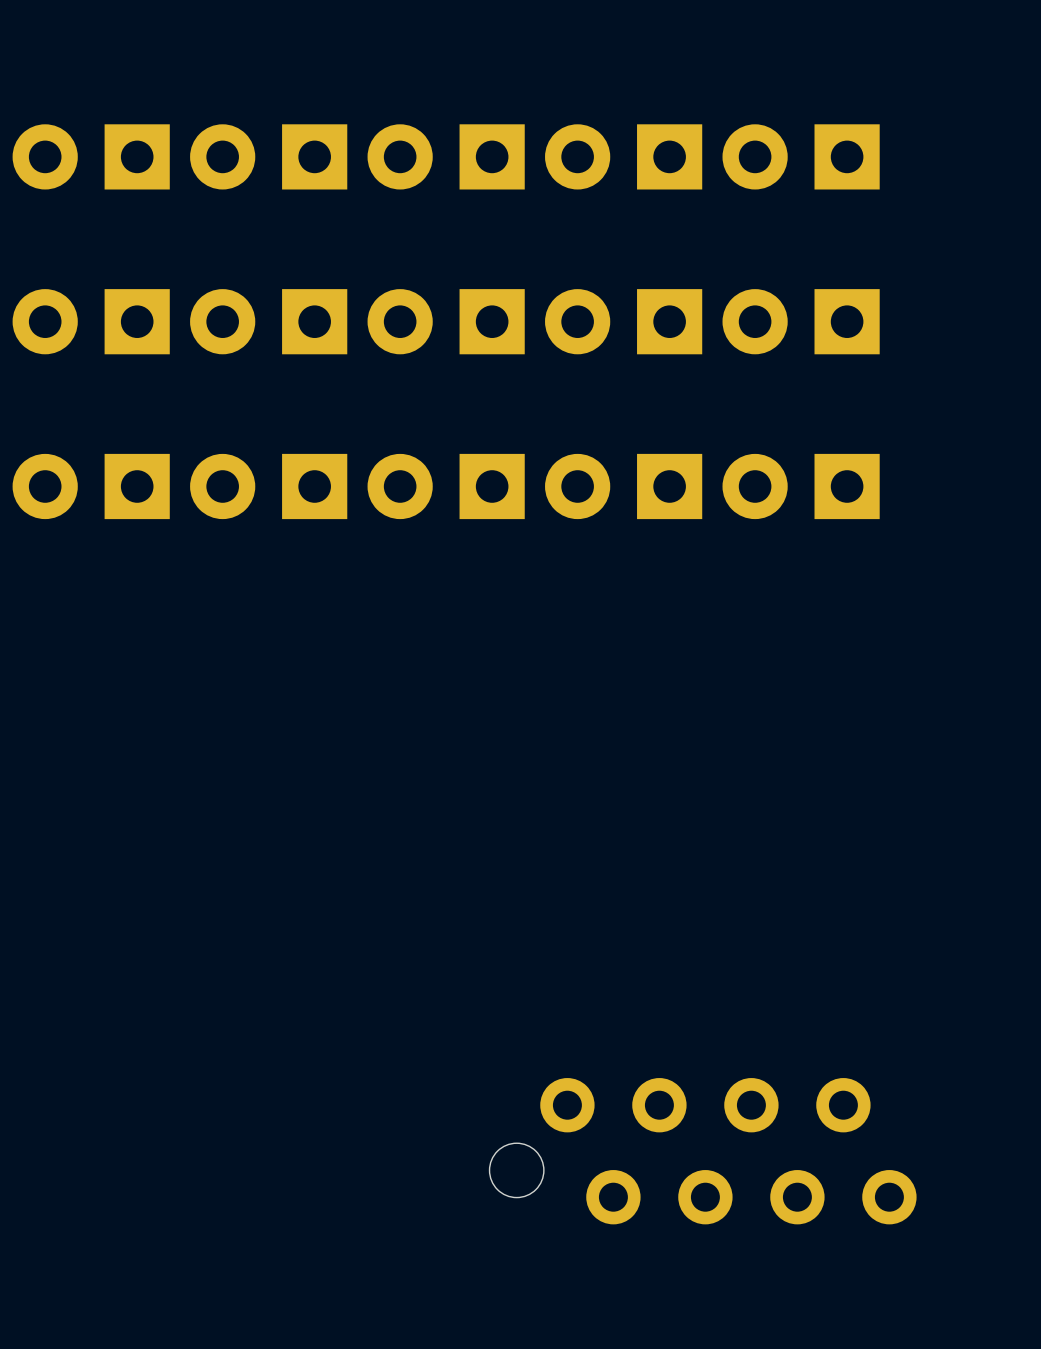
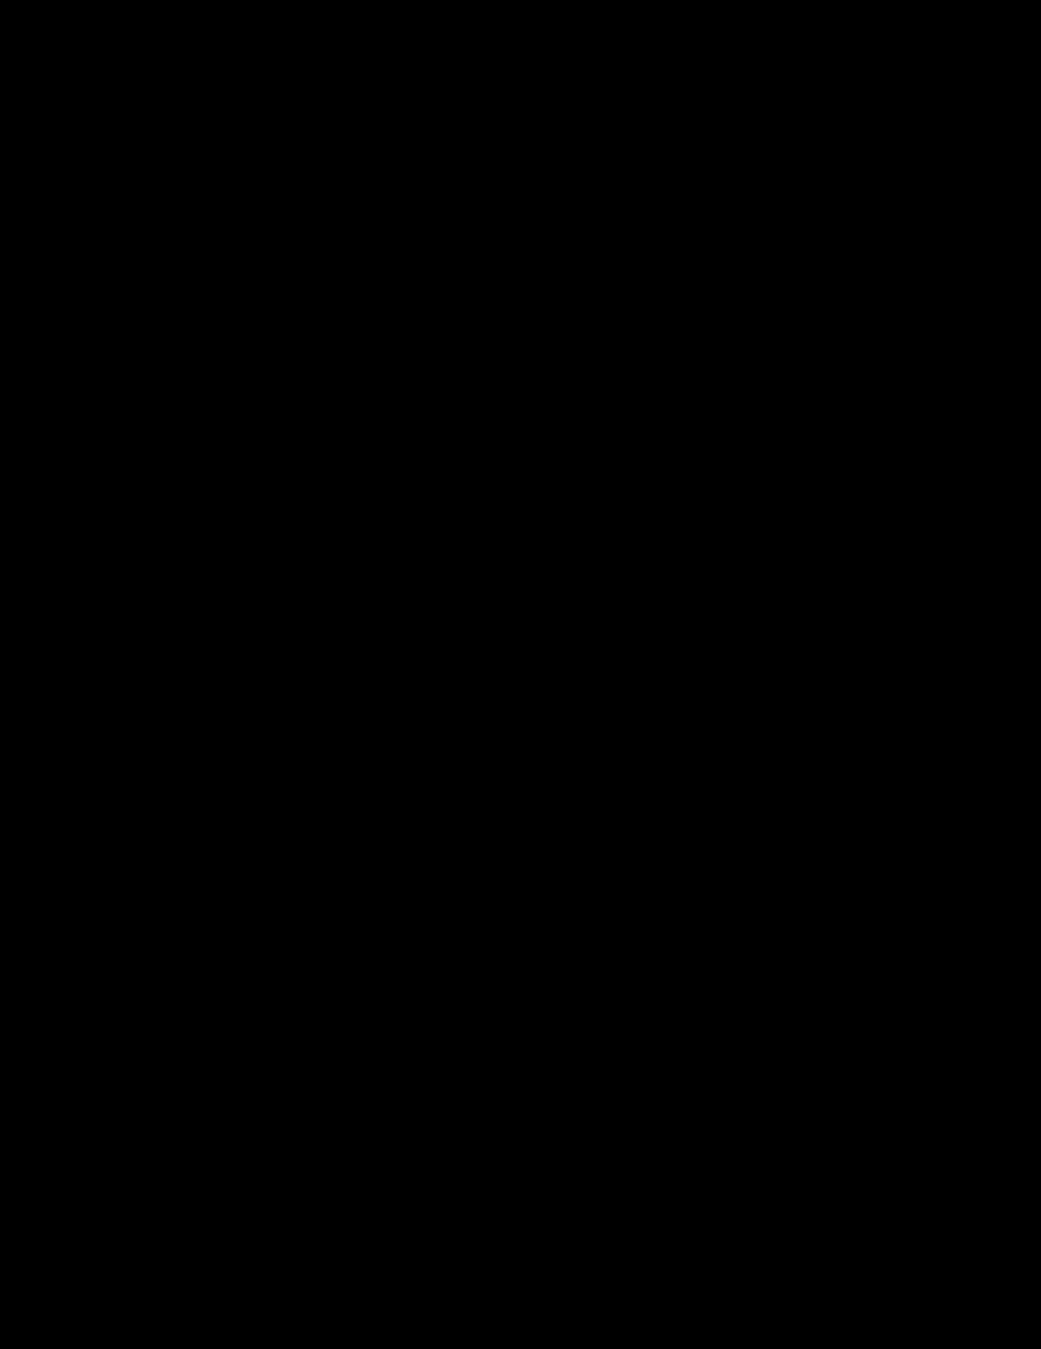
part: (91, 156) -> none
part: (268, 156) -> none
part: (446, 156) -> none
part: (623, 156) -> none
part: (801, 156) -> none
part: (91, 321) -> none
part: (268, 321) -> none
part: (446, 321) -> none
part: (623, 321) -> none
part: (801, 321) -> none
part: (91, 486) -> none
part: (268, 486) -> none
part: (446, 486) -> none
part: (623, 486) -> none
part: (801, 486) -> none
part: (703, 1151) -> none

